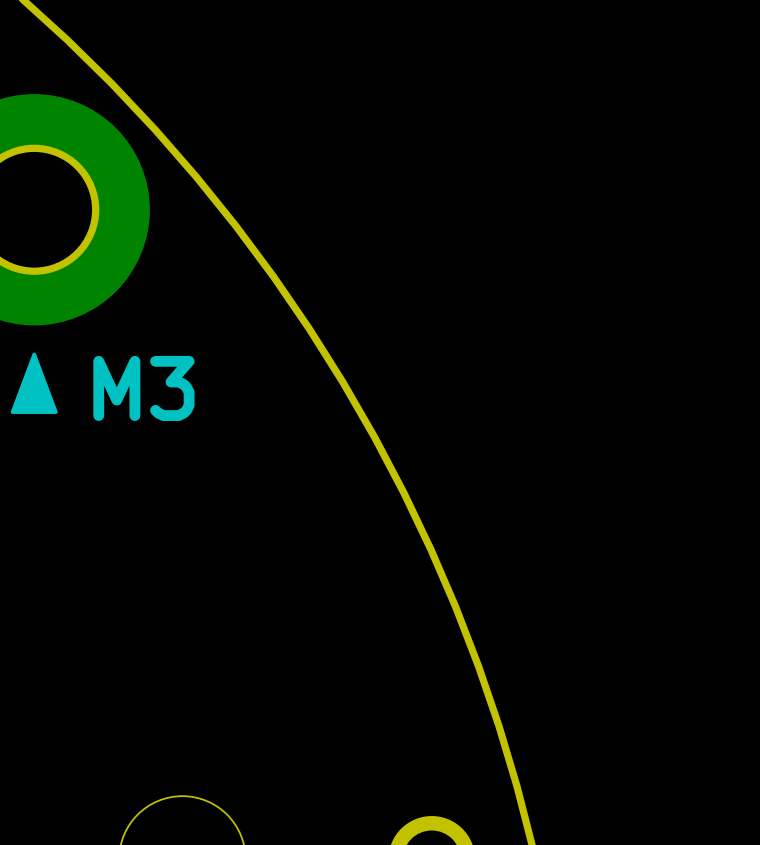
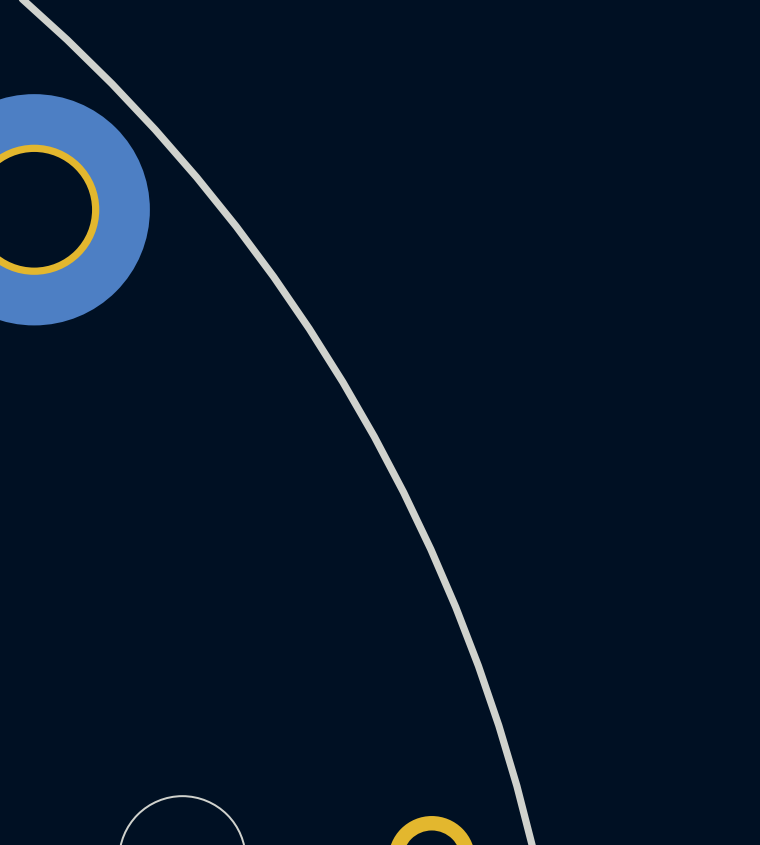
drawing: [10, 352, 58, 414] -> none
text: M3 (143, 388) -> none

